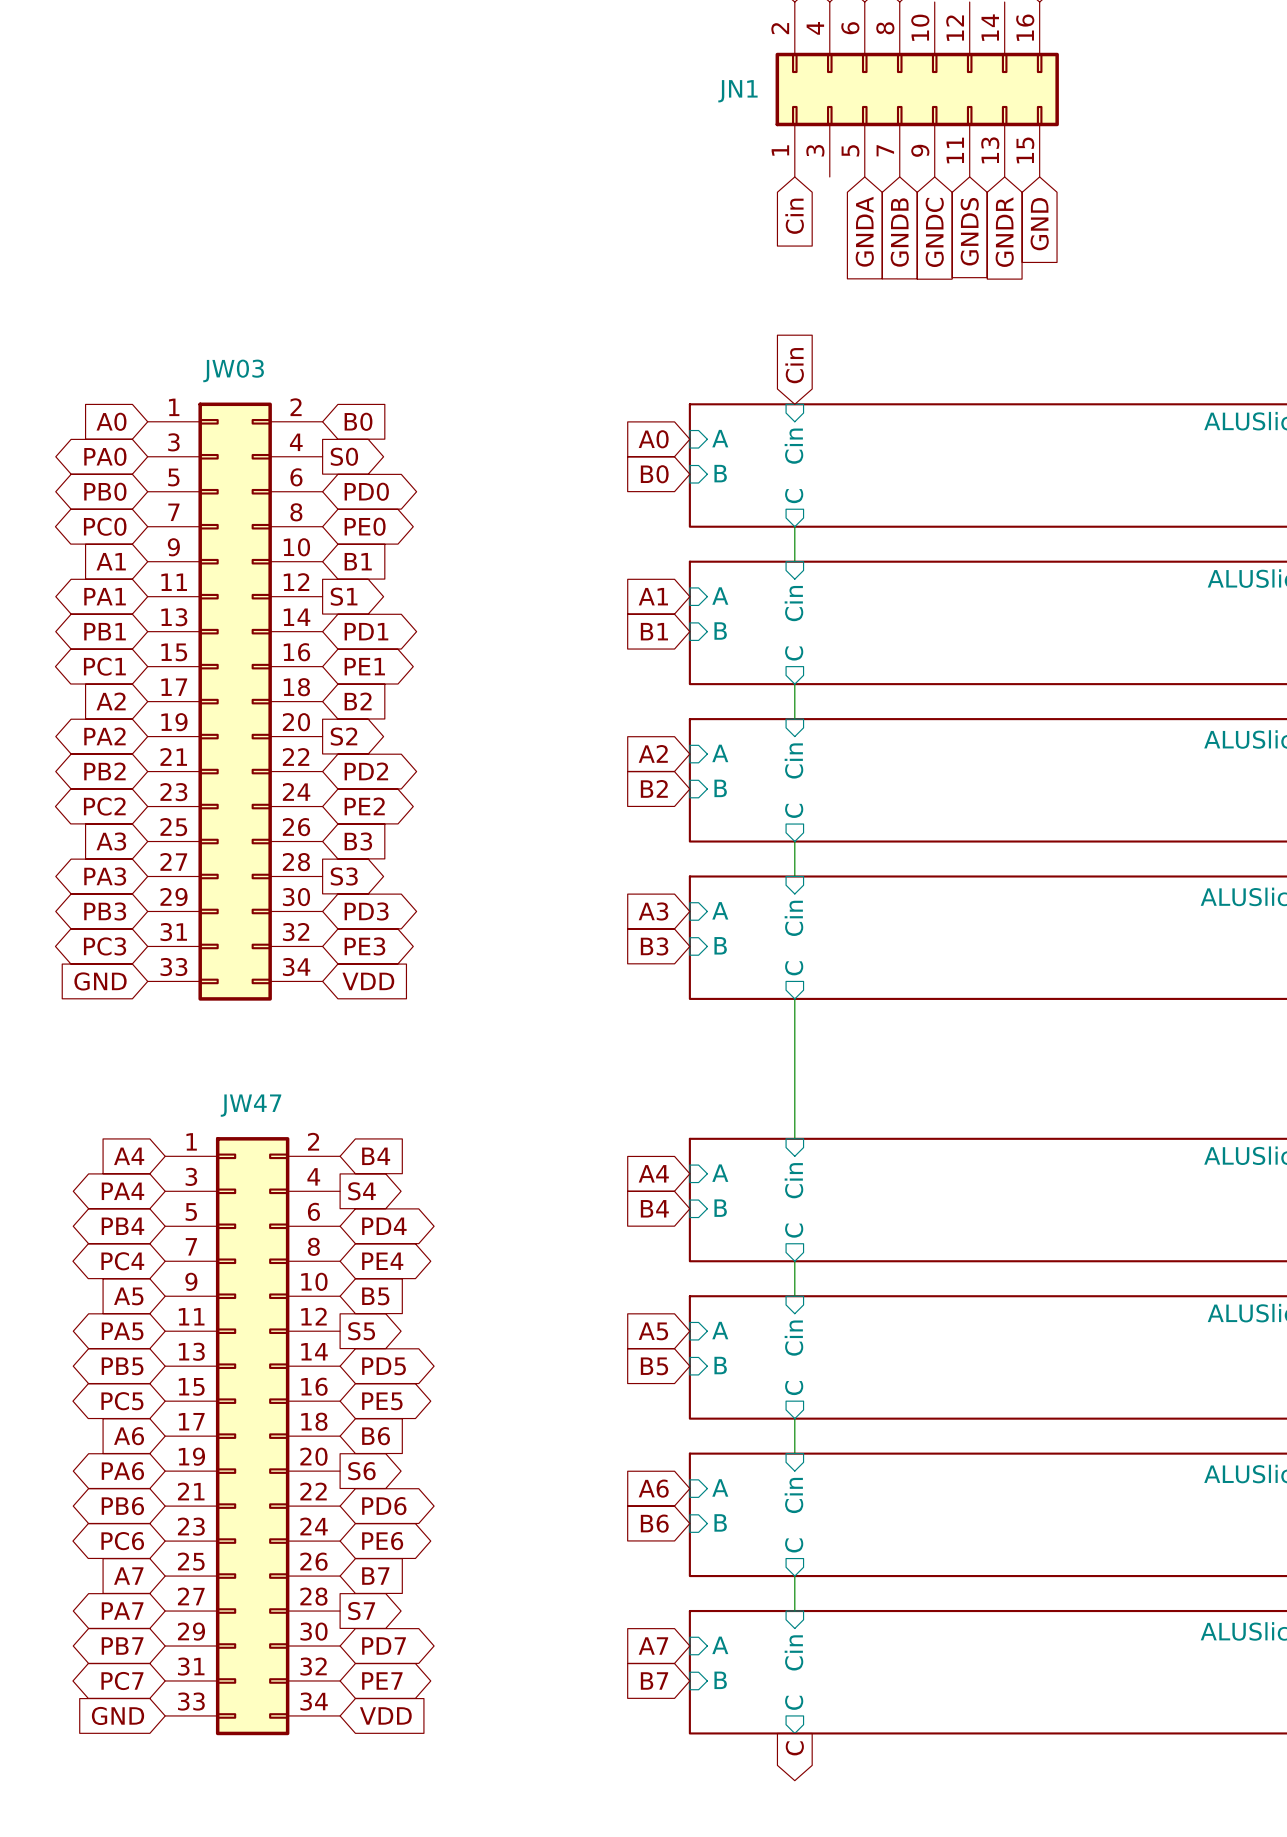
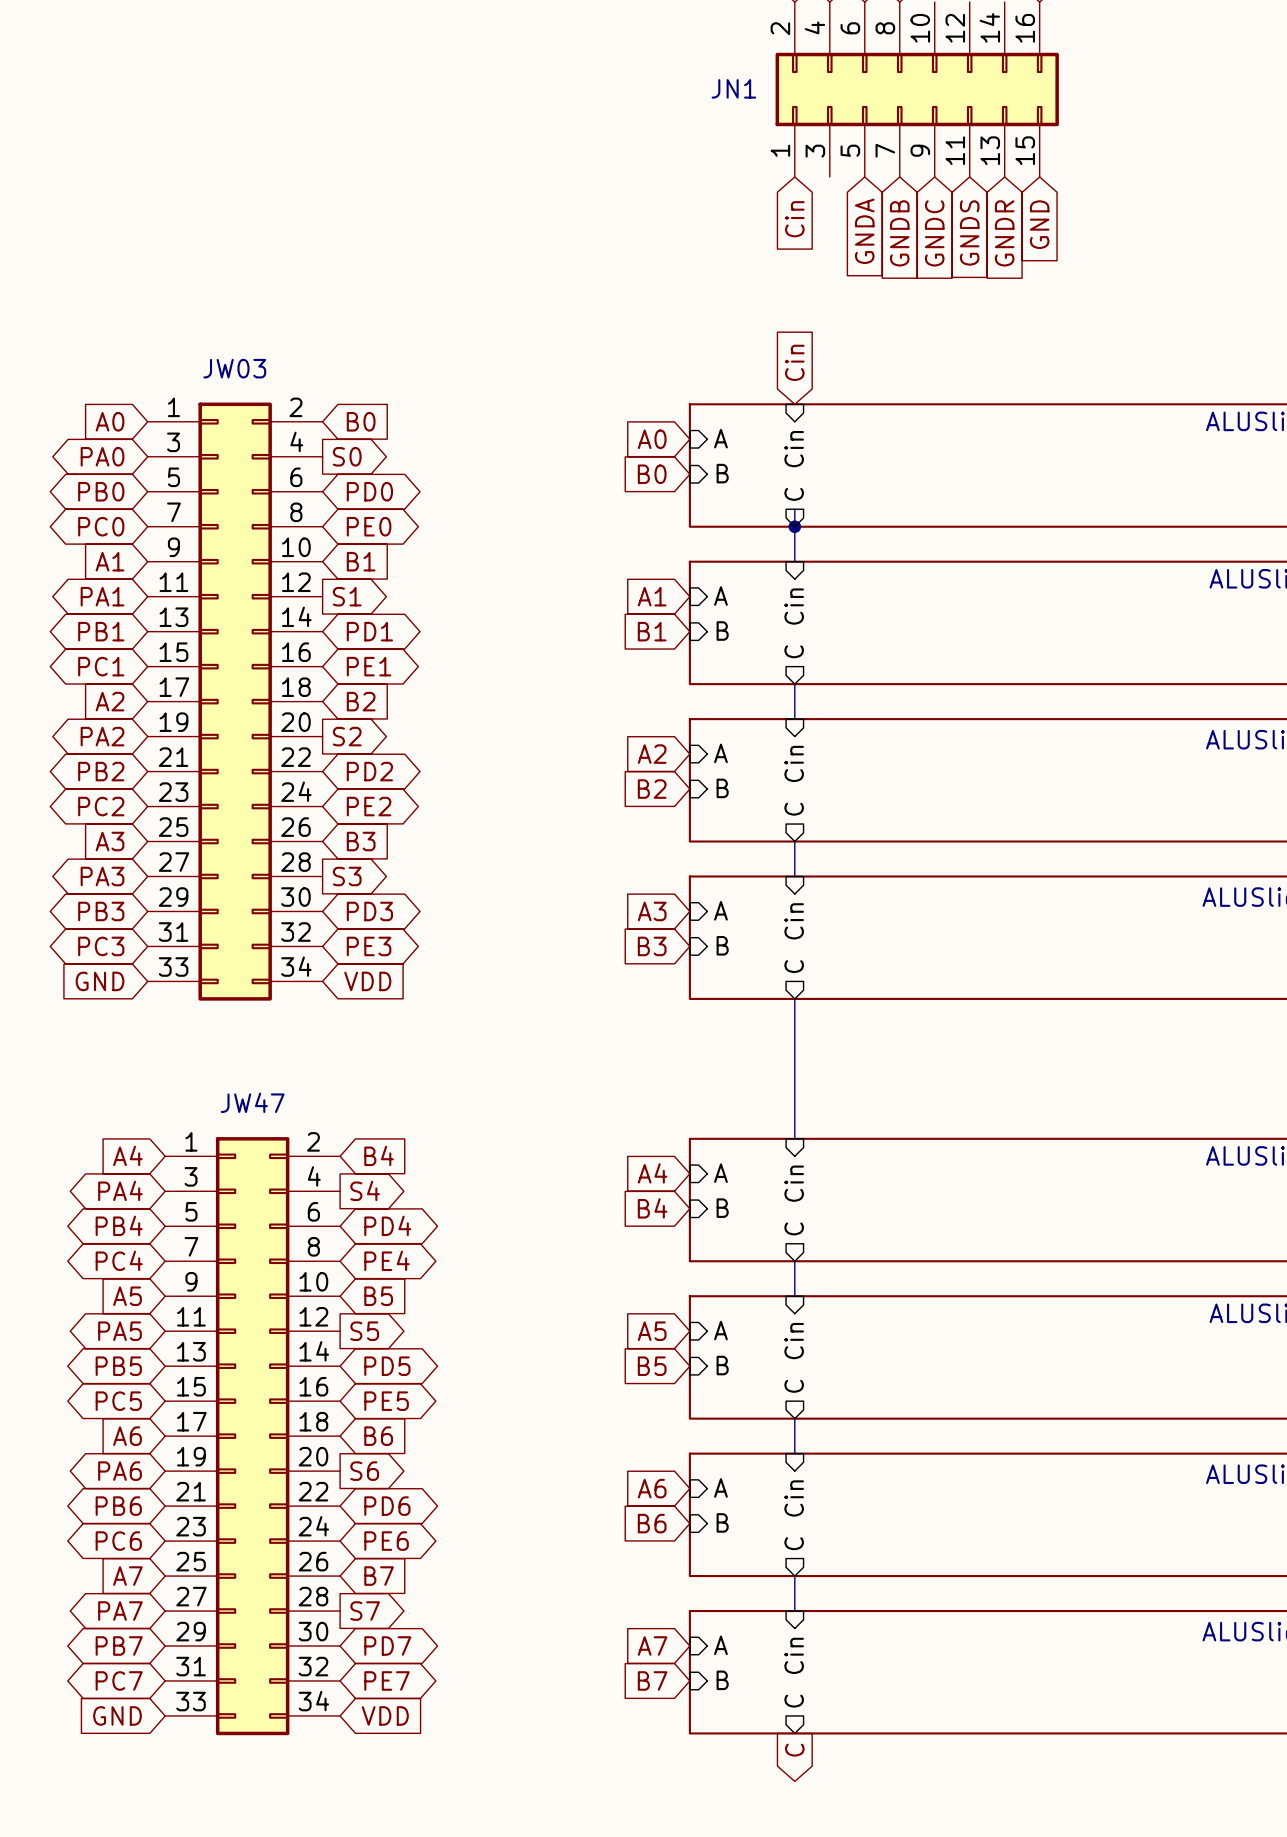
wire: none -> (794, 509) (794, 526)
junction: none -> (794, 526)

